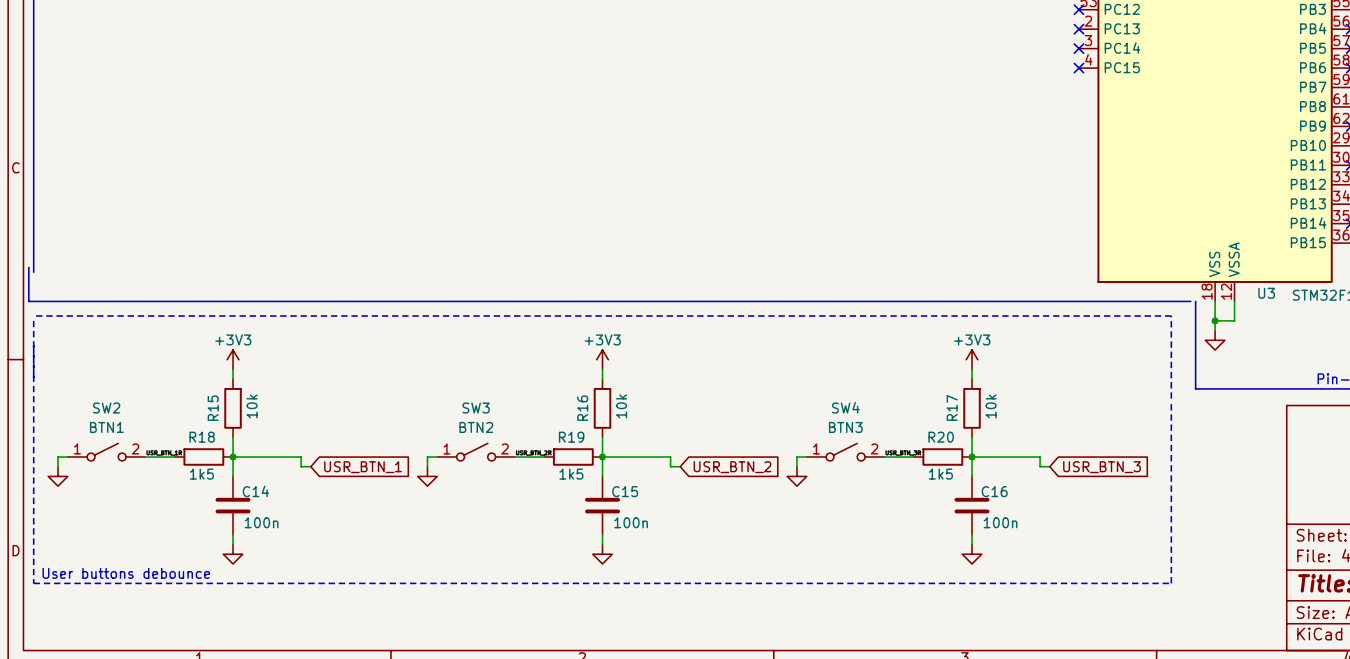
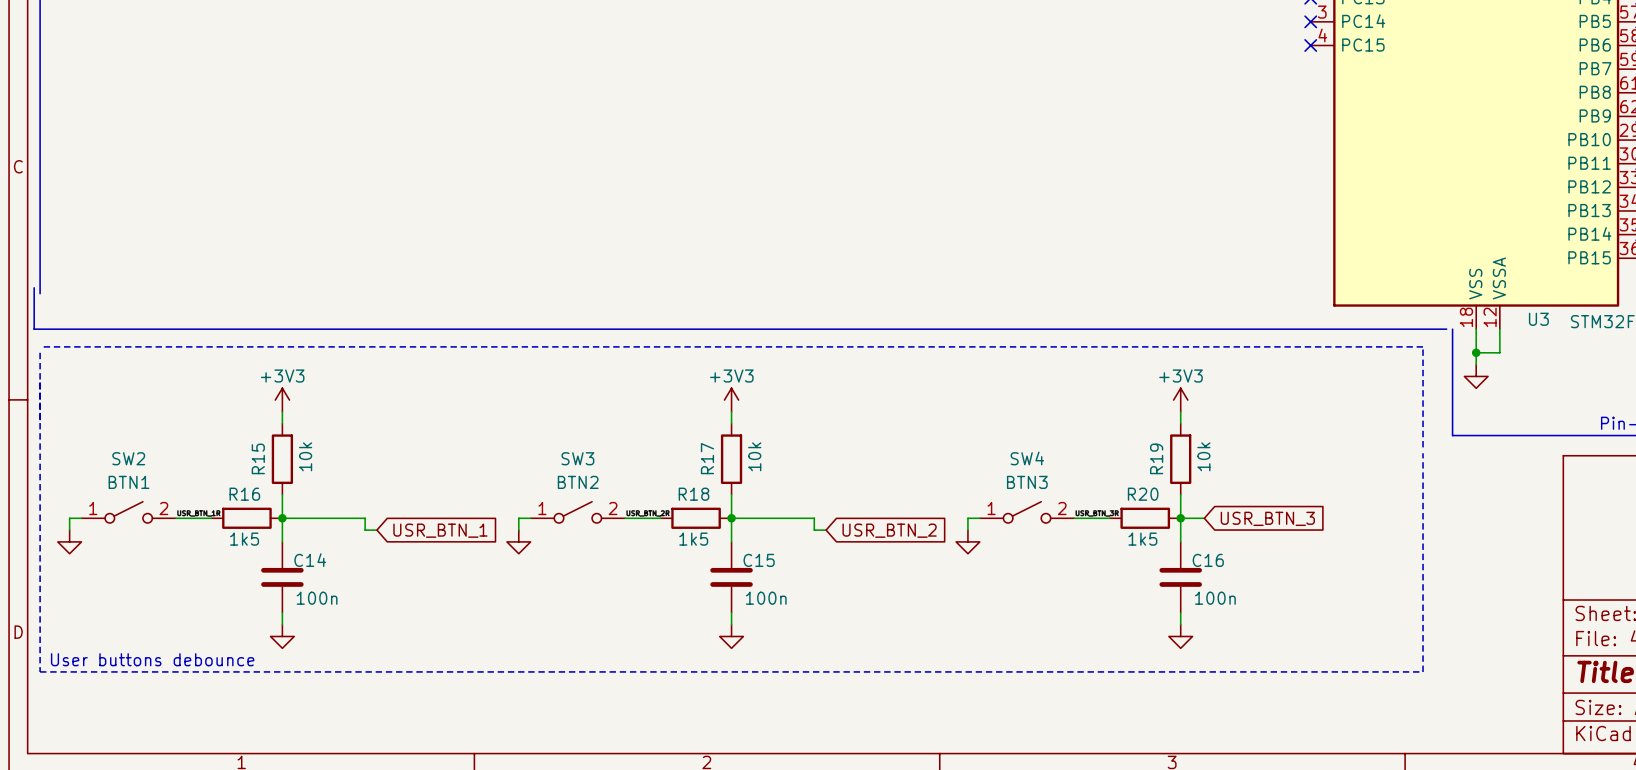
R17 name: R17 (952, 407) -> R19 (1156, 458)
R16 name: R16 (582, 408) -> R17 (707, 458)
R18 name: R18 (202, 437) -> R16 (244, 494)
R19 name: R19 (571, 437) -> R18 (694, 494)
wire: (991, 456) (1040, 456) (1040, 466) (1049, 466) -> none
global label position: USR_BTN_3 (1102, 467) -> USR_BTN_3 (1267, 518)

